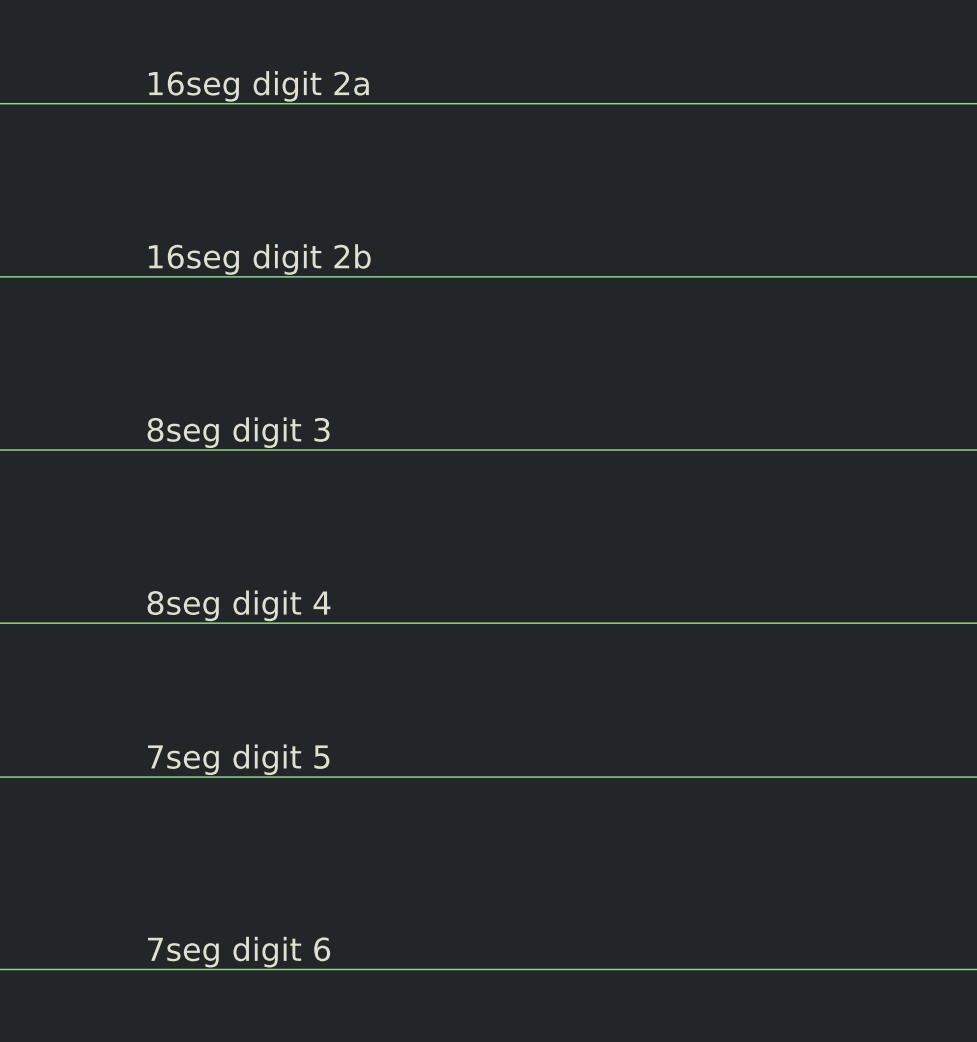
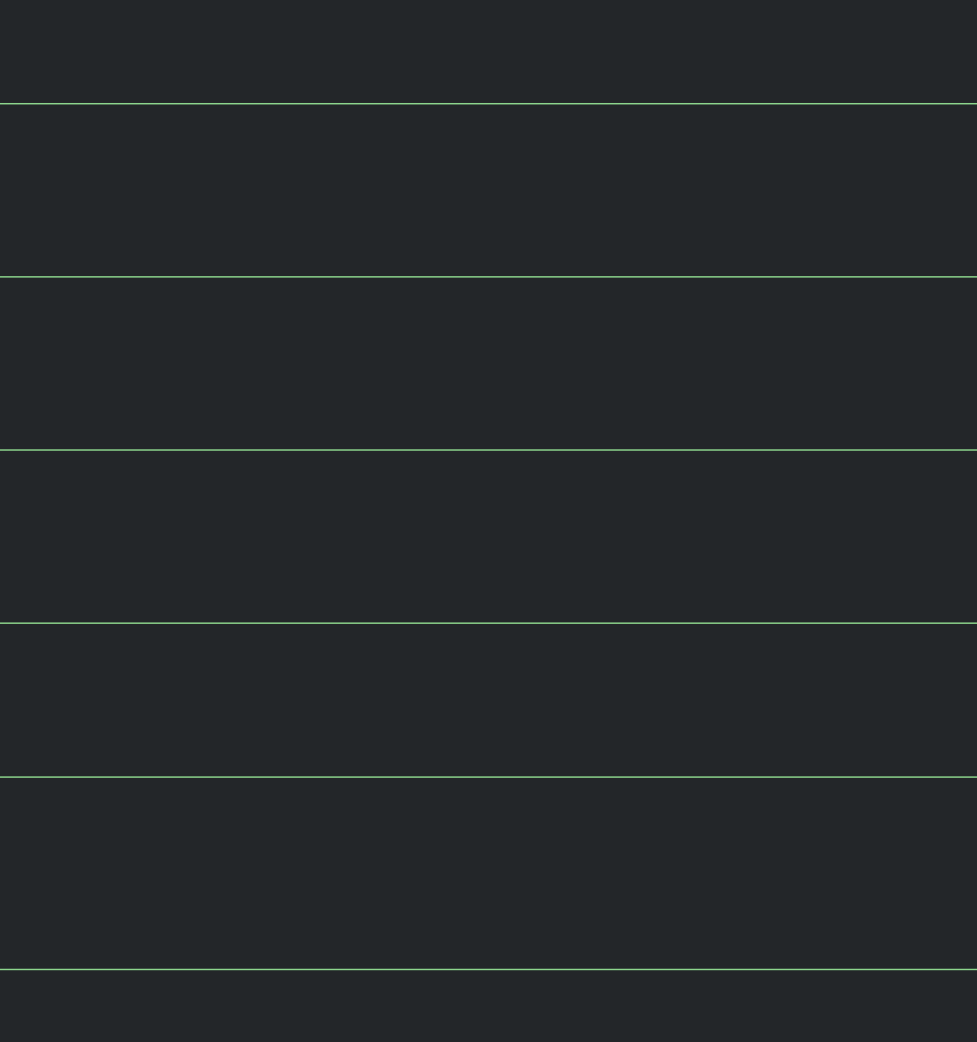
label: 16seg digit 2a (258, 86) -> none
label: 16seg digit 2b (259, 259) -> none
label: 8seg digit 3 (238, 432) -> none
label: 8seg digit 4 (238, 605) -> none
label: 7seg digit 5 (238, 759) -> none
label: 7seg digit 6 (239, 952) -> none

